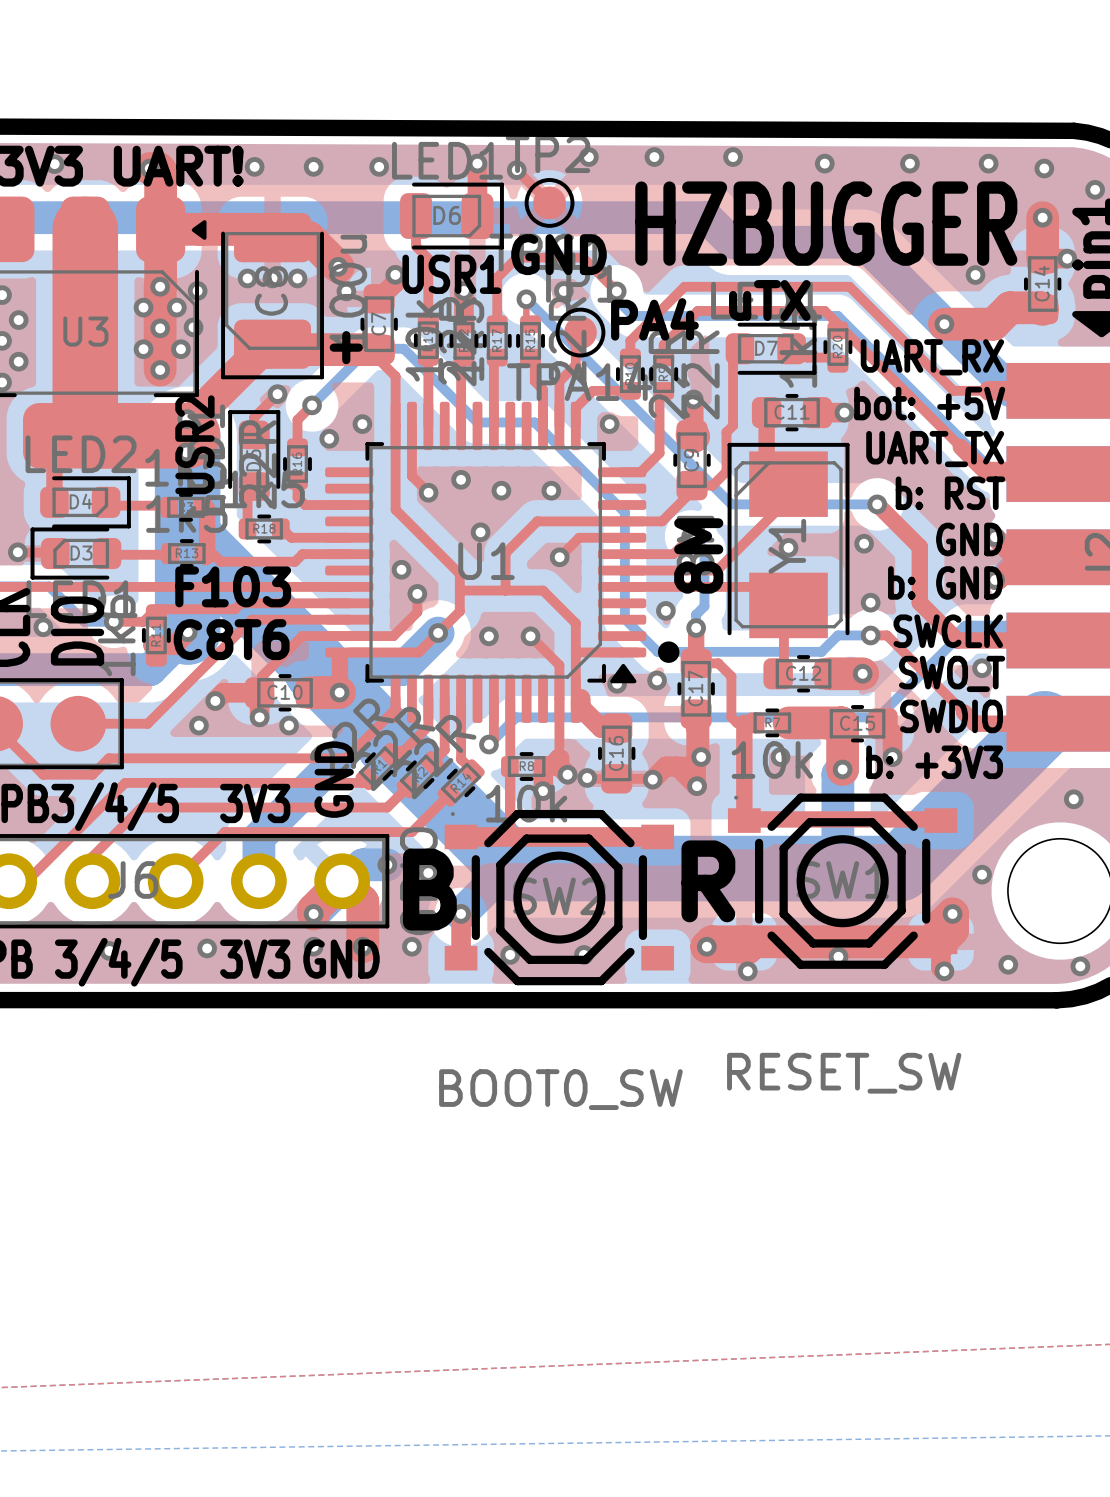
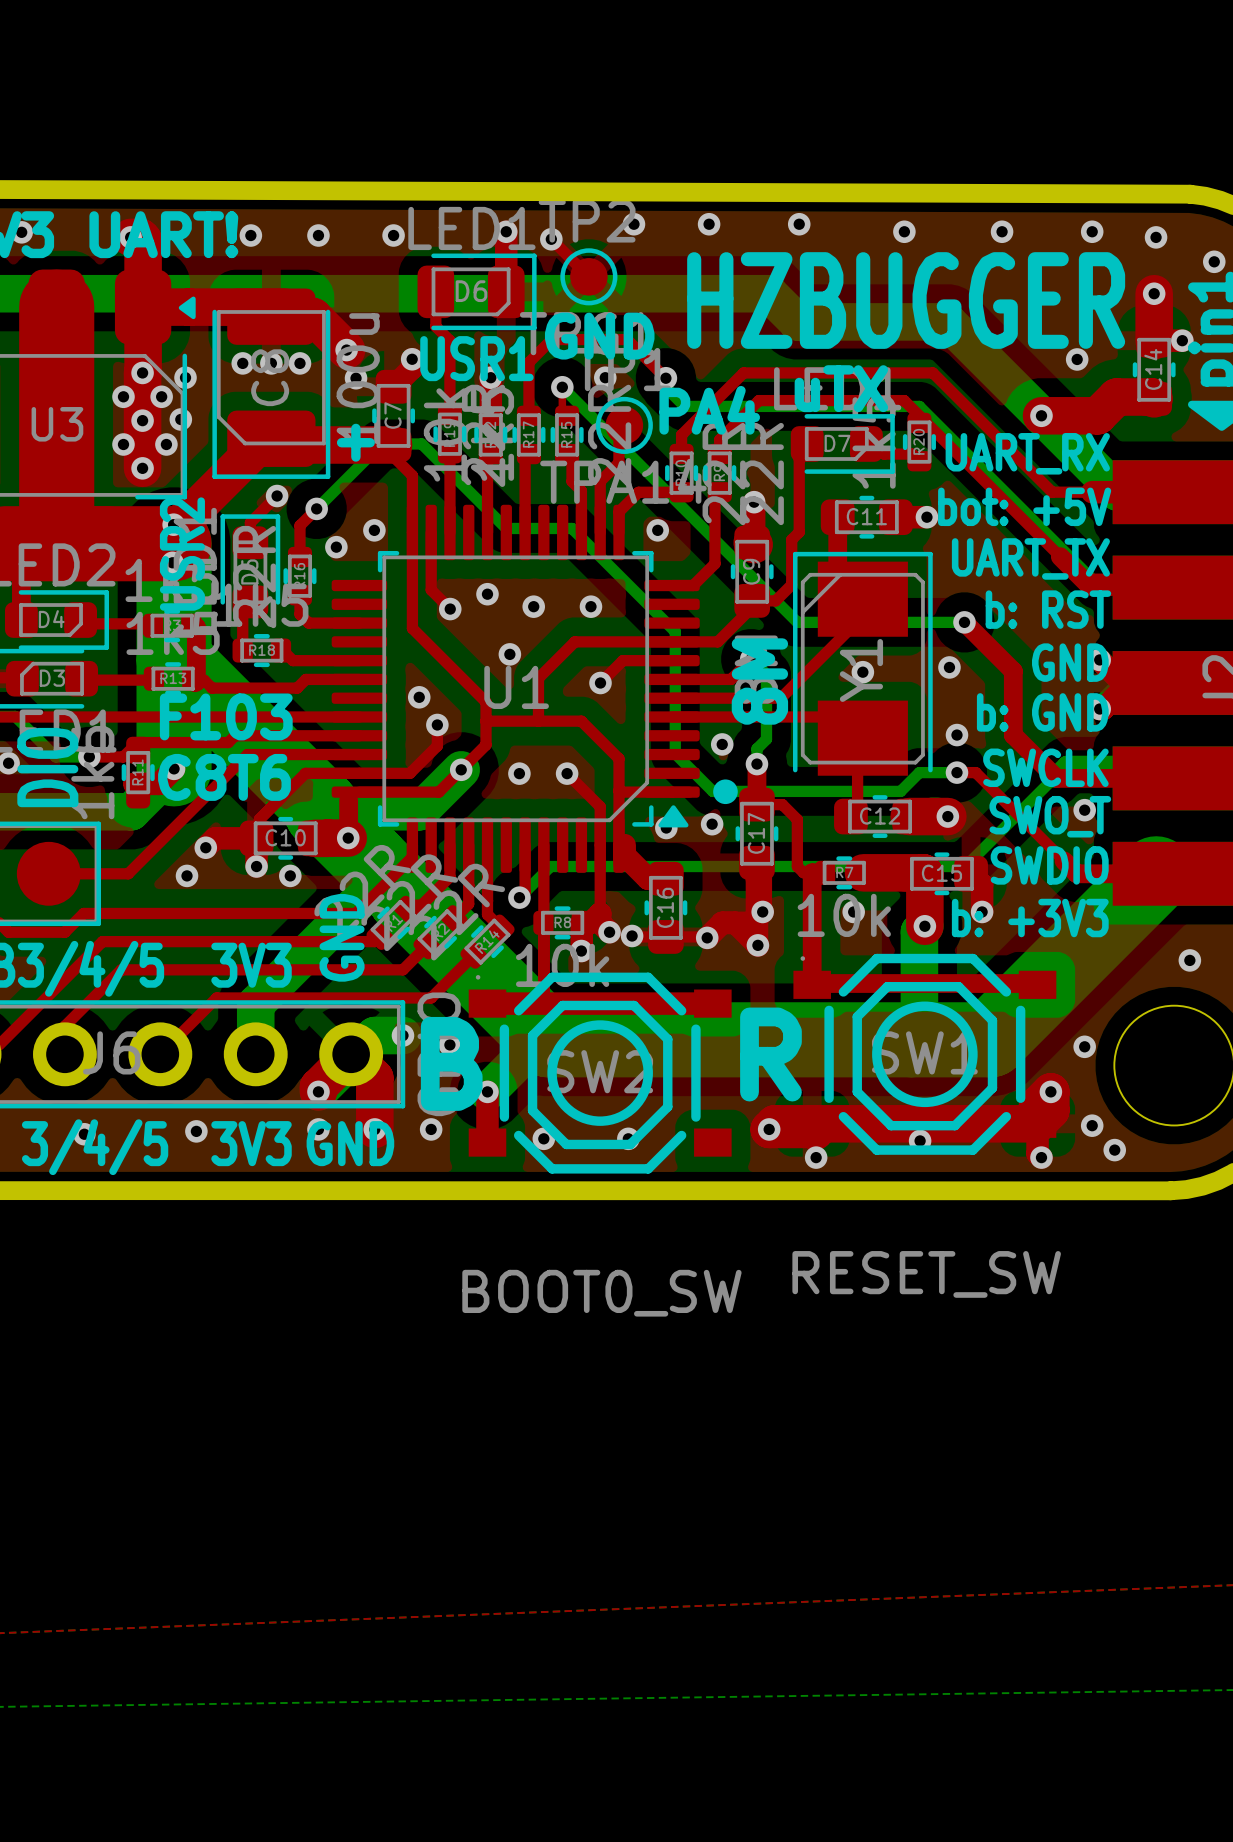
via: none -> (1092, 1125)
via: (1080, 966) -> none

